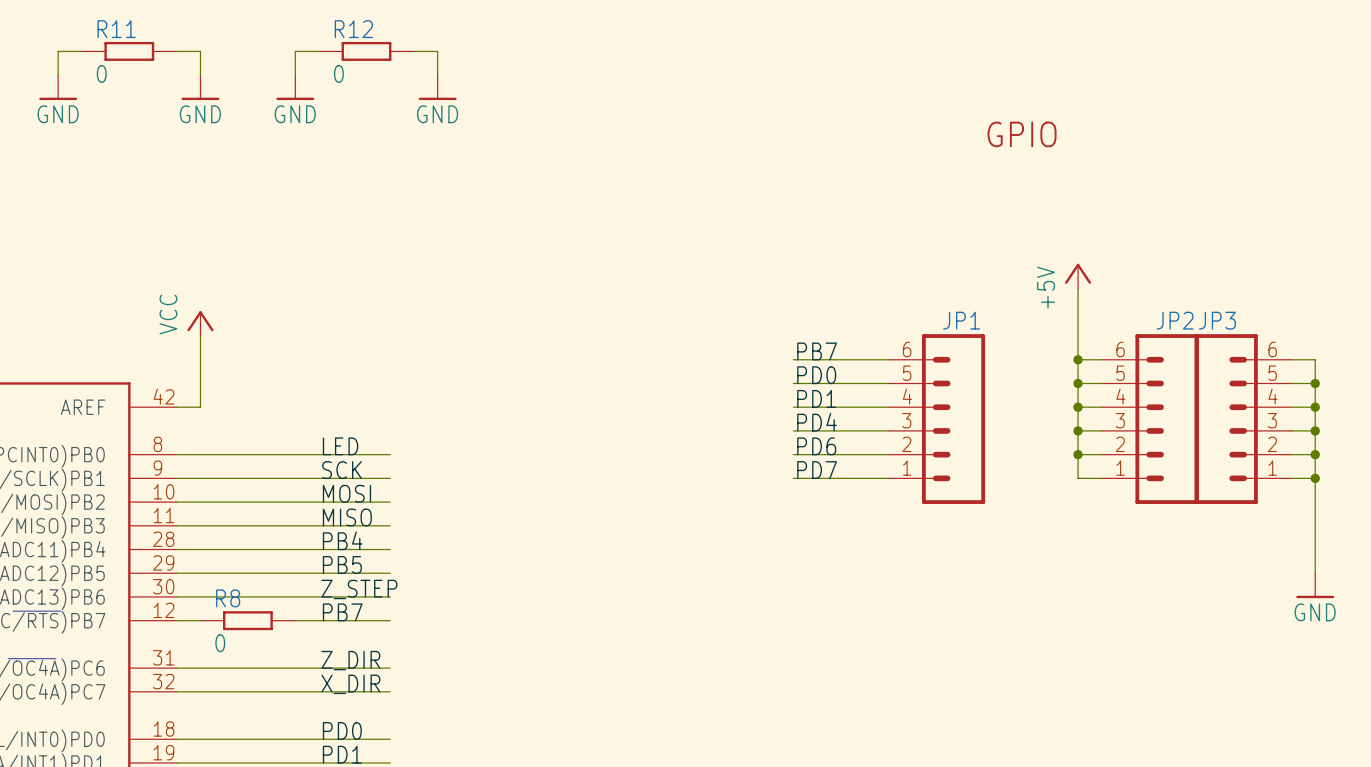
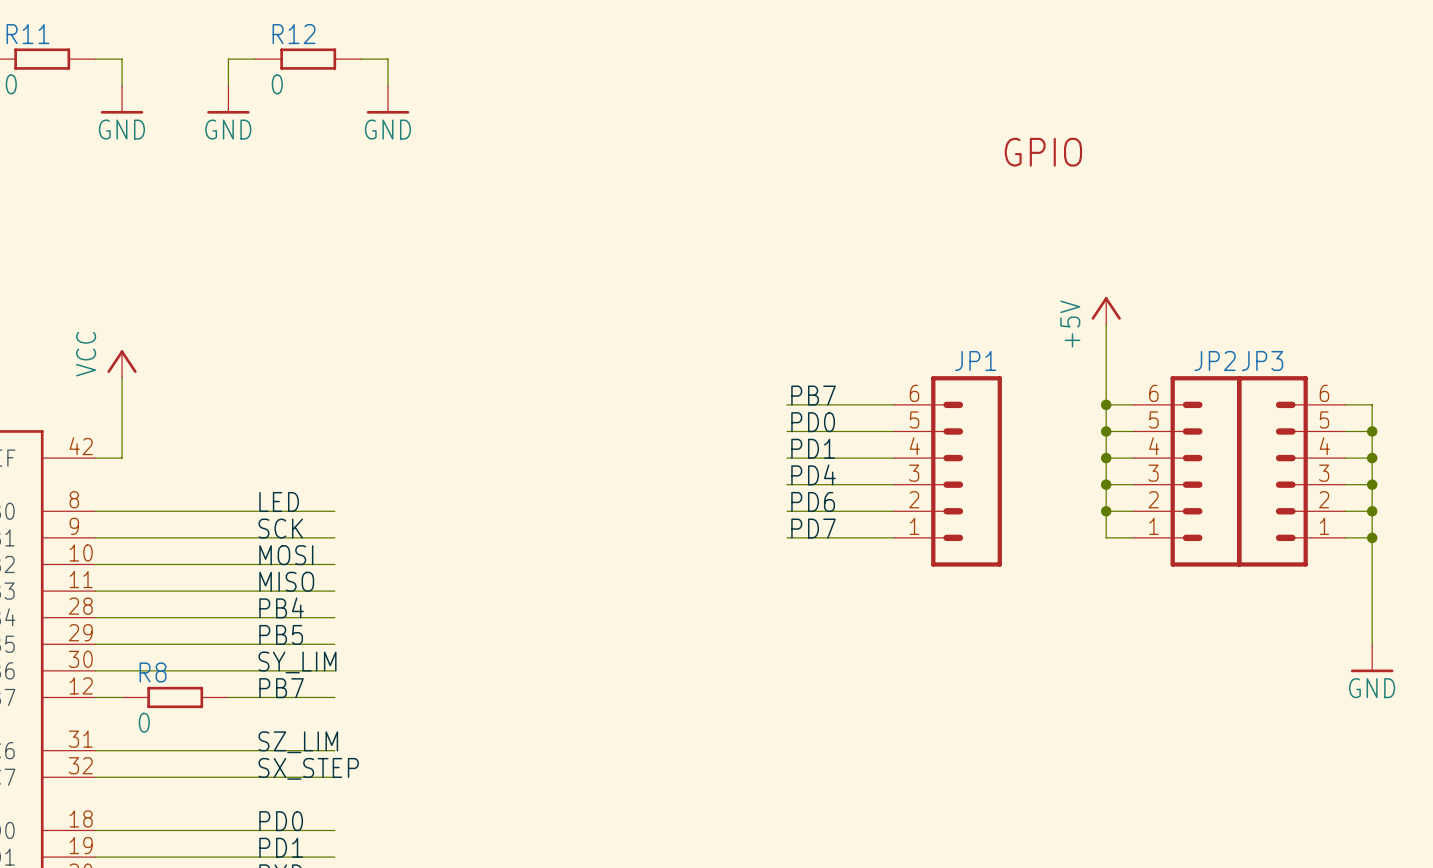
label: Z_STEP (359, 589) -> SY_LIM (297, 662)
label: Z_DIR (350, 660) -> SZ_LIM (298, 742)
label: X_DIR (350, 684) -> SX_STEP (308, 768)

